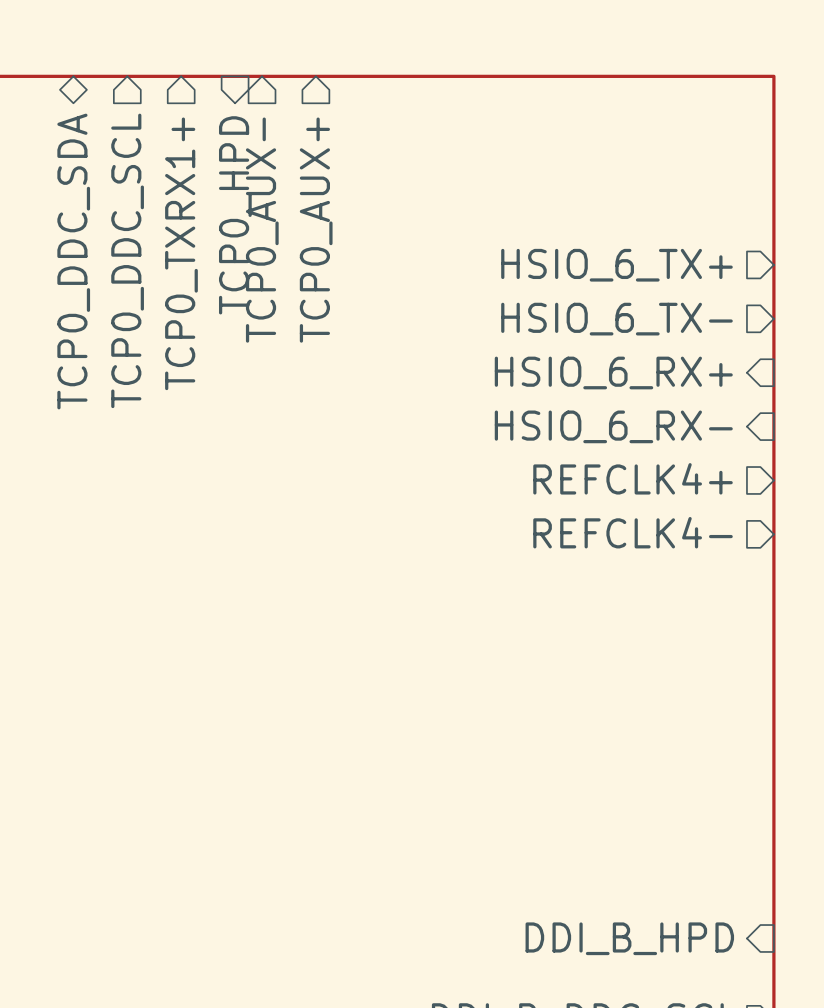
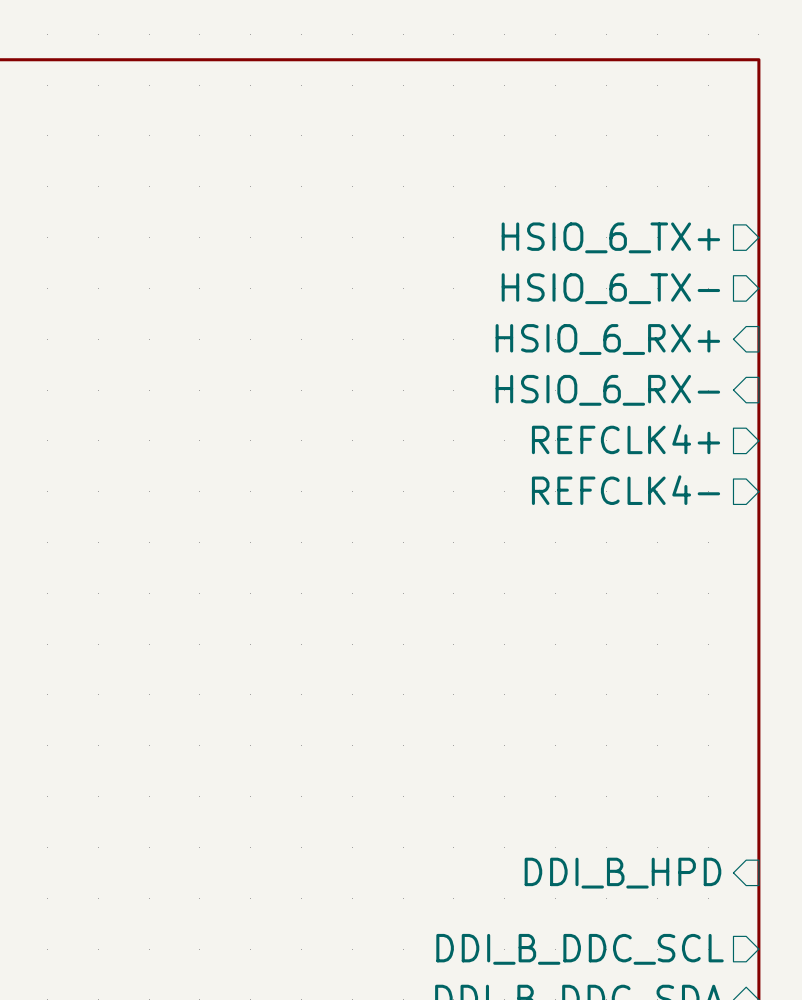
sheet pin: TCP0_HPD (235, 215) -> none
sheet pin: TCP0_AUX- (262, 230) -> none
sheet pin: TCP0_AUX+ (316, 230) -> none
sheet pin: TCP0_TXRX1+ (181, 253) -> none
sheet pin: TCP0_DDC_SCL (127, 260) -> none
sheet pin: TCP0_DDC_SDA (73, 261) -> none

